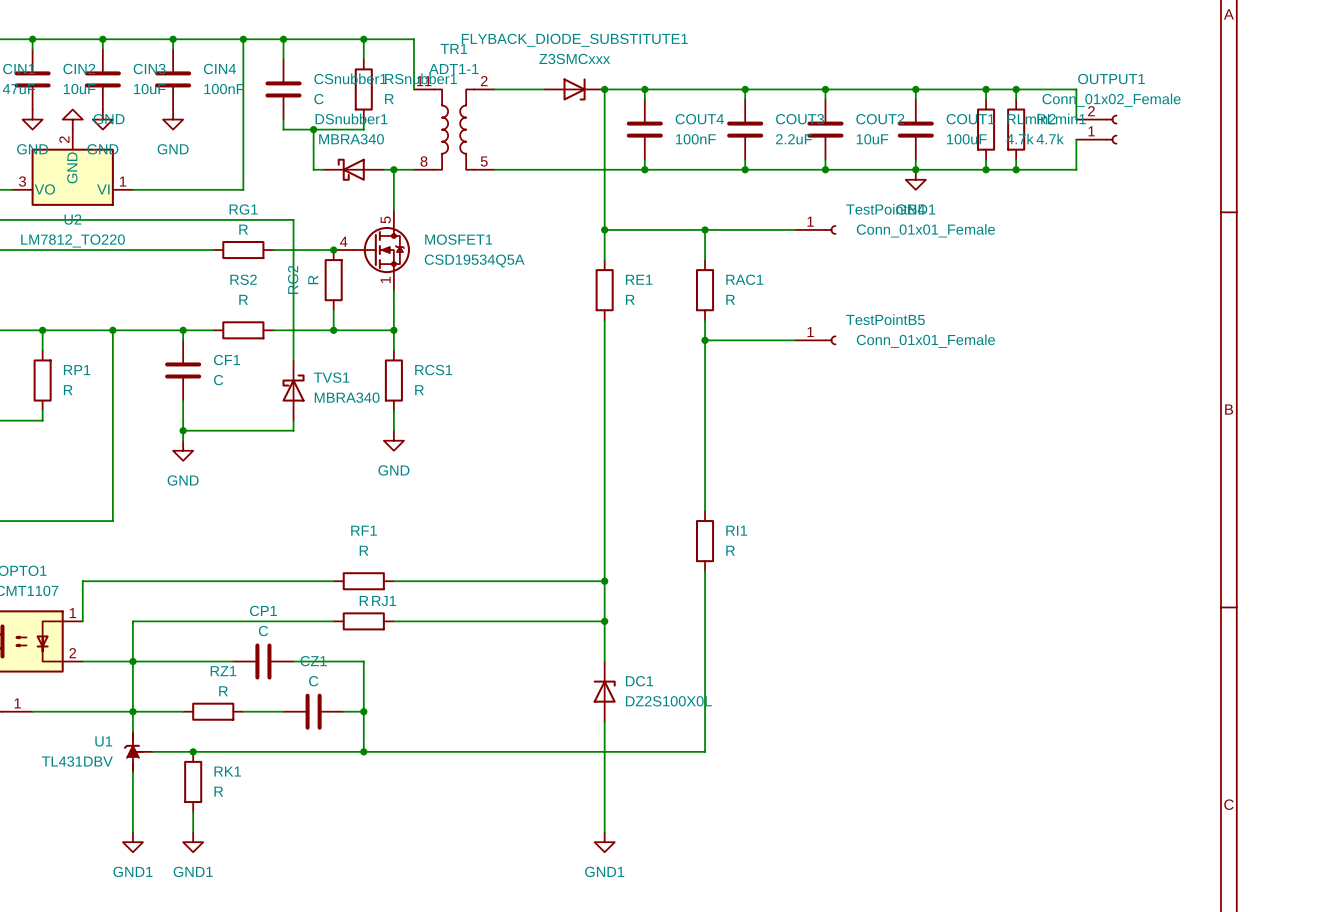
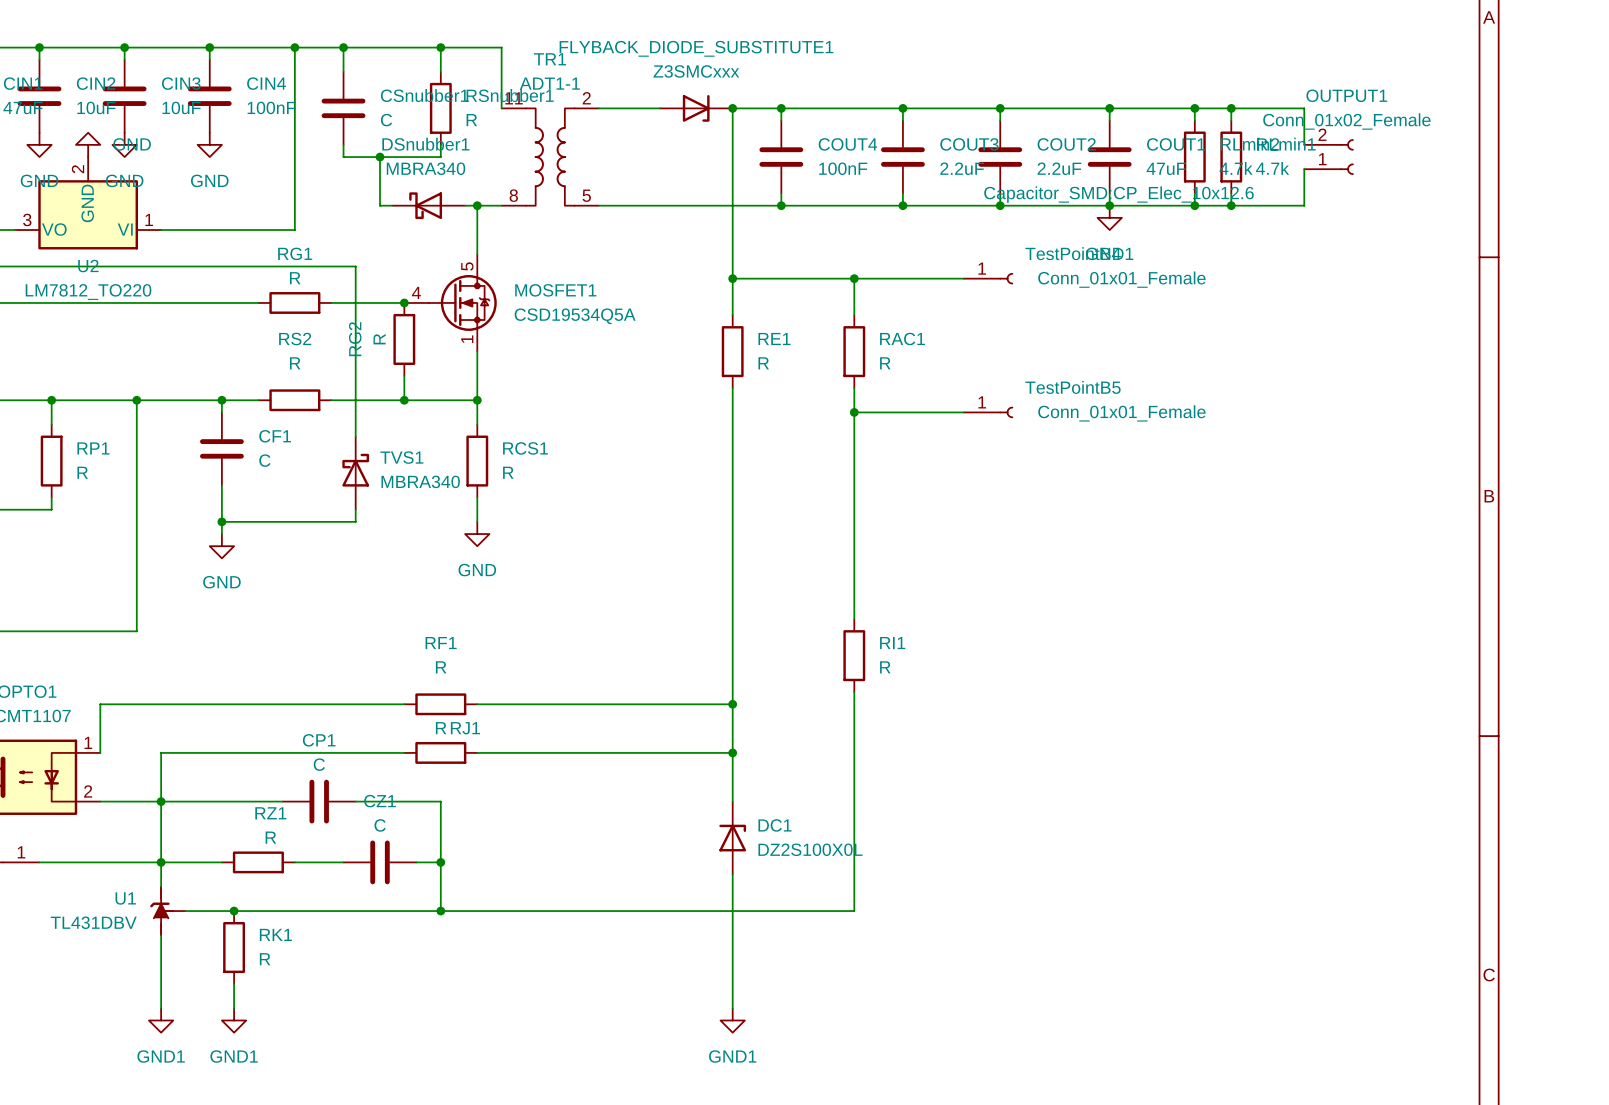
COUT2 value: 10uF (872, 139) -> 2.2uF (1059, 168)
COUT1 value: 100uF (966, 139) -> 47uF (1166, 168)
COUT1 text: none -> Capacitor_SMD:CP_Elec_10x12.6 (1118, 194)

